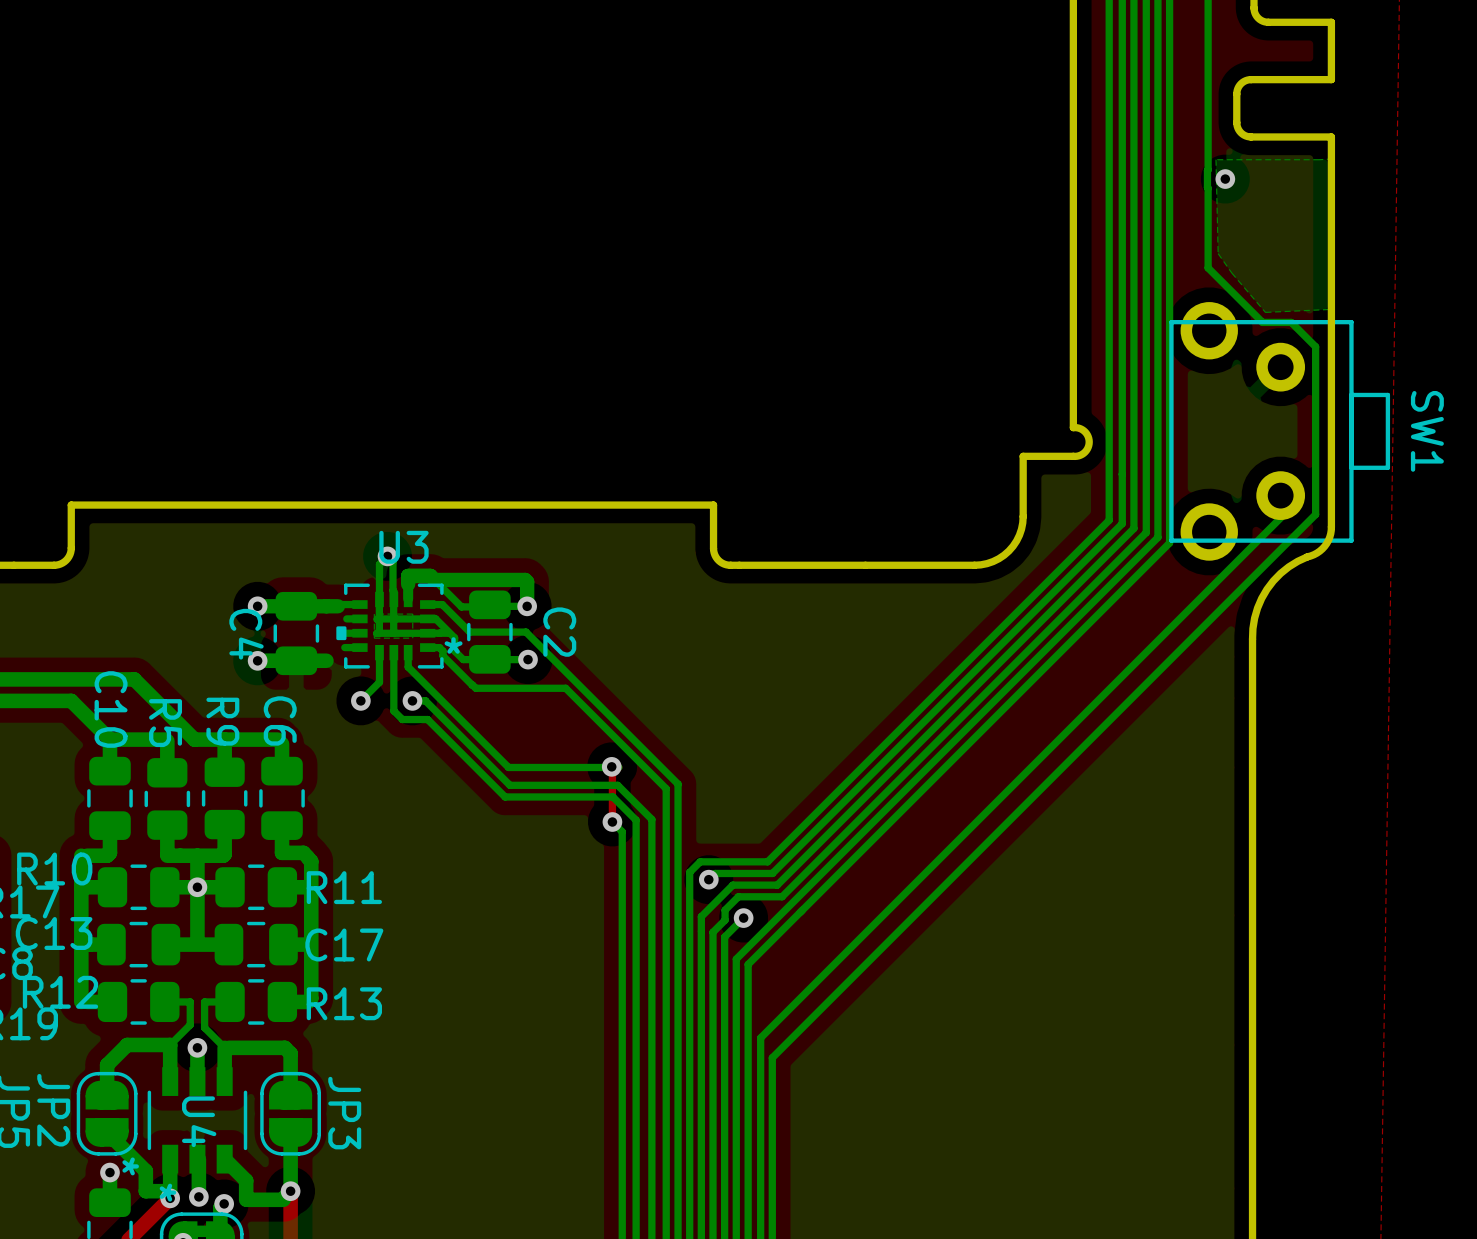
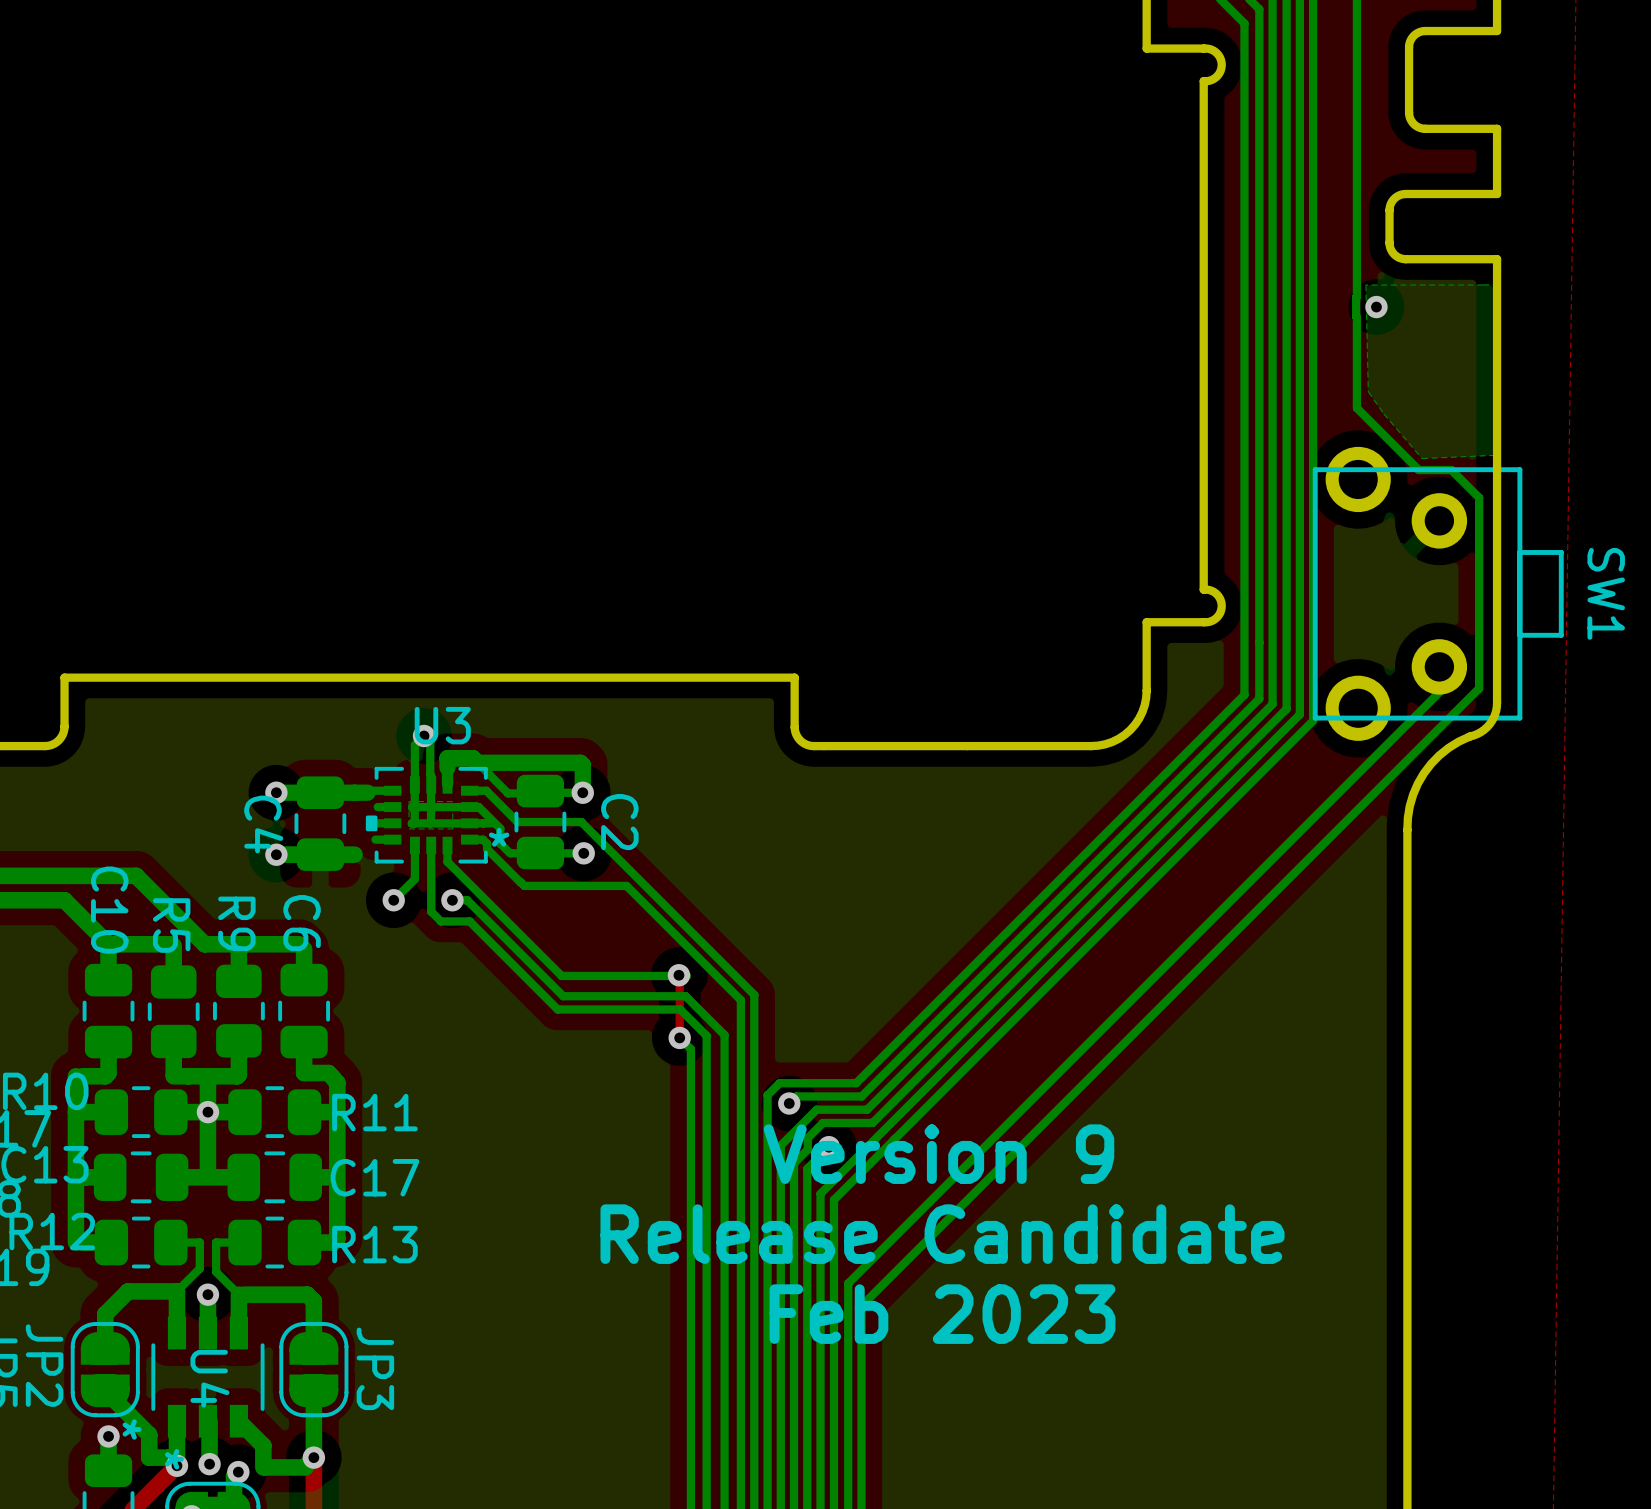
text: none -> Version 9 (938, 1154)
text: none -> Release Candidate (942, 1234)
text: none -> Feb 2023 (942, 1314)

